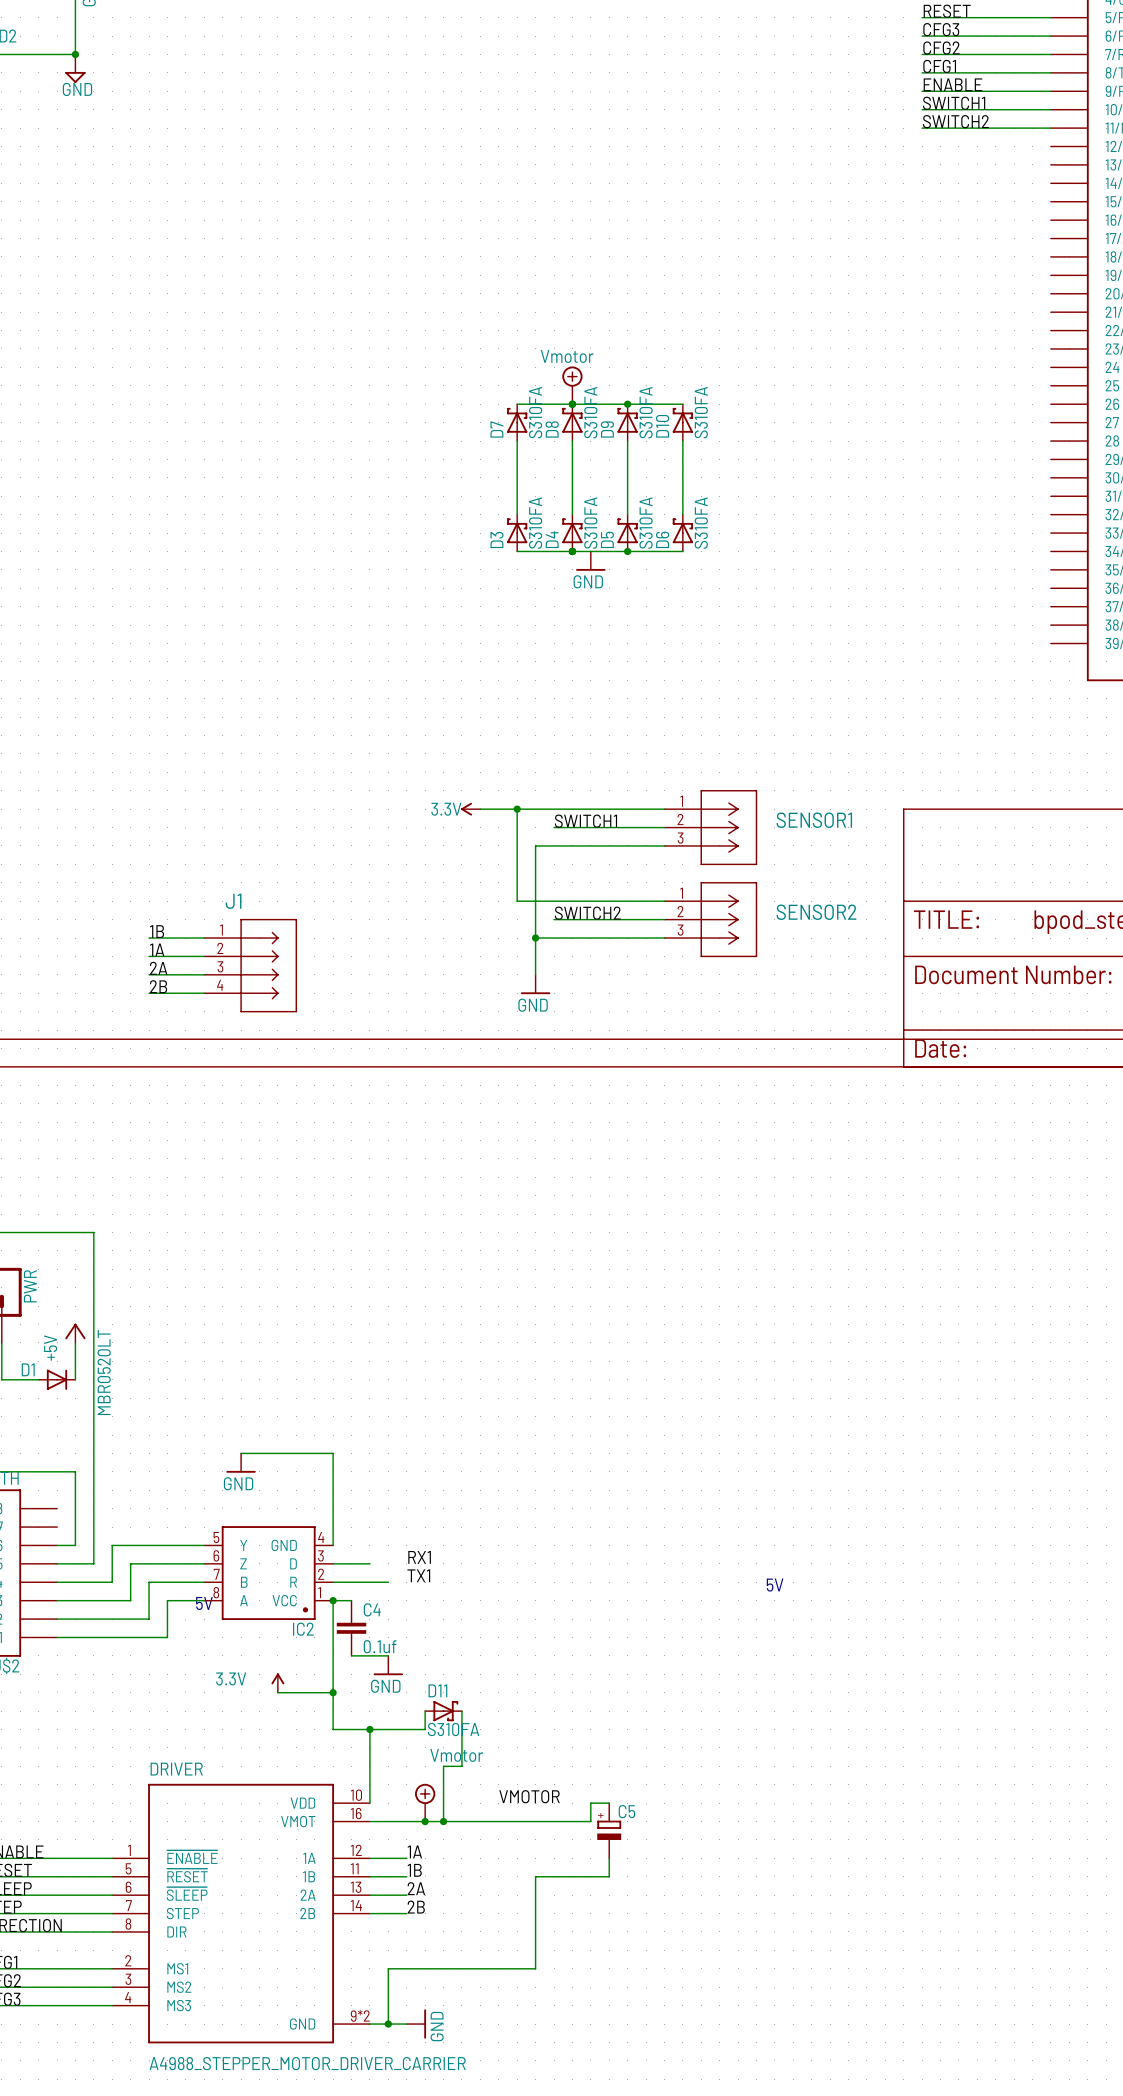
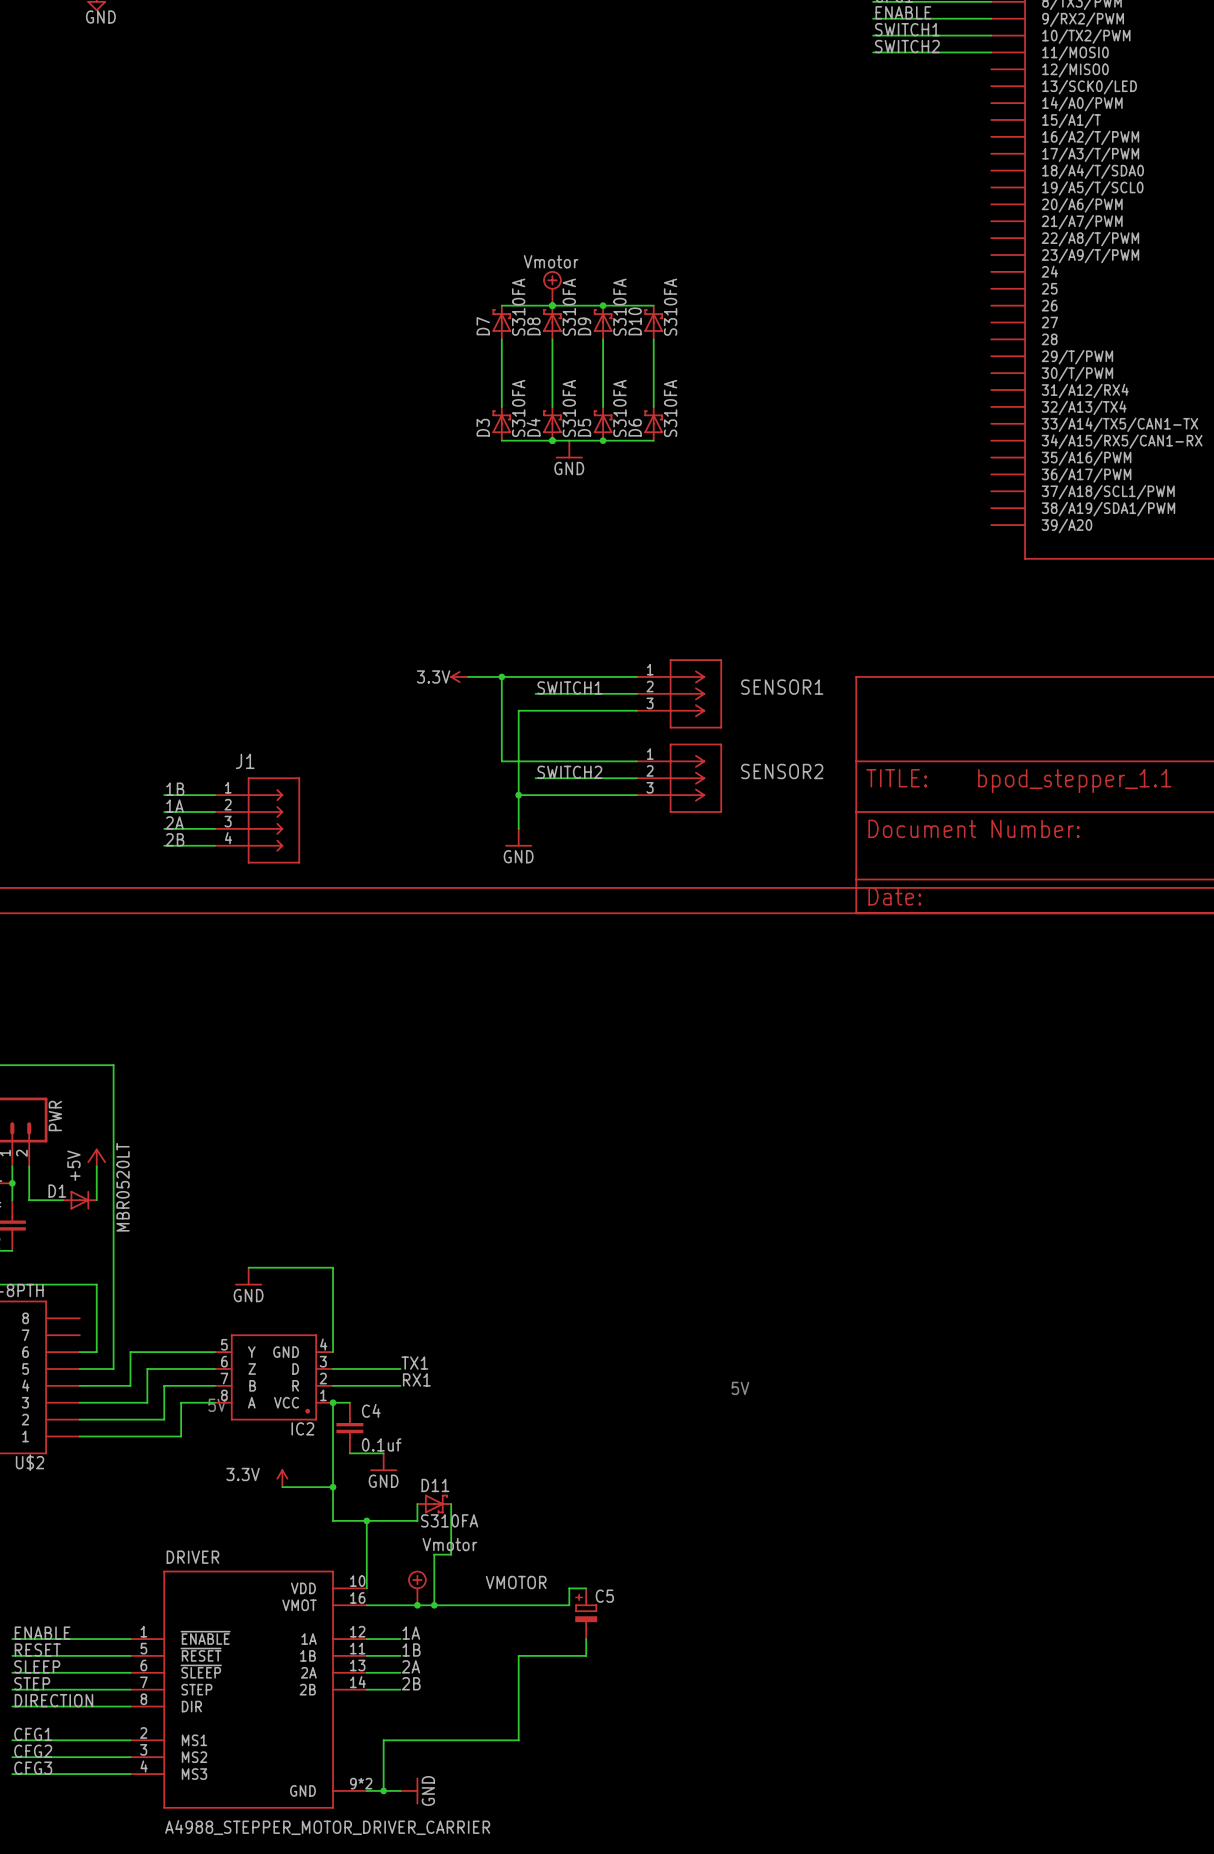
label: RX1 (419, 1557) -> TX1 (414, 1363)
wire: none -> (366, 1368) (400, 1368)
label: TX1 (418, 1575) -> RX1 (416, 1379)
wire: none -> (383, 1385) (400, 1385)

